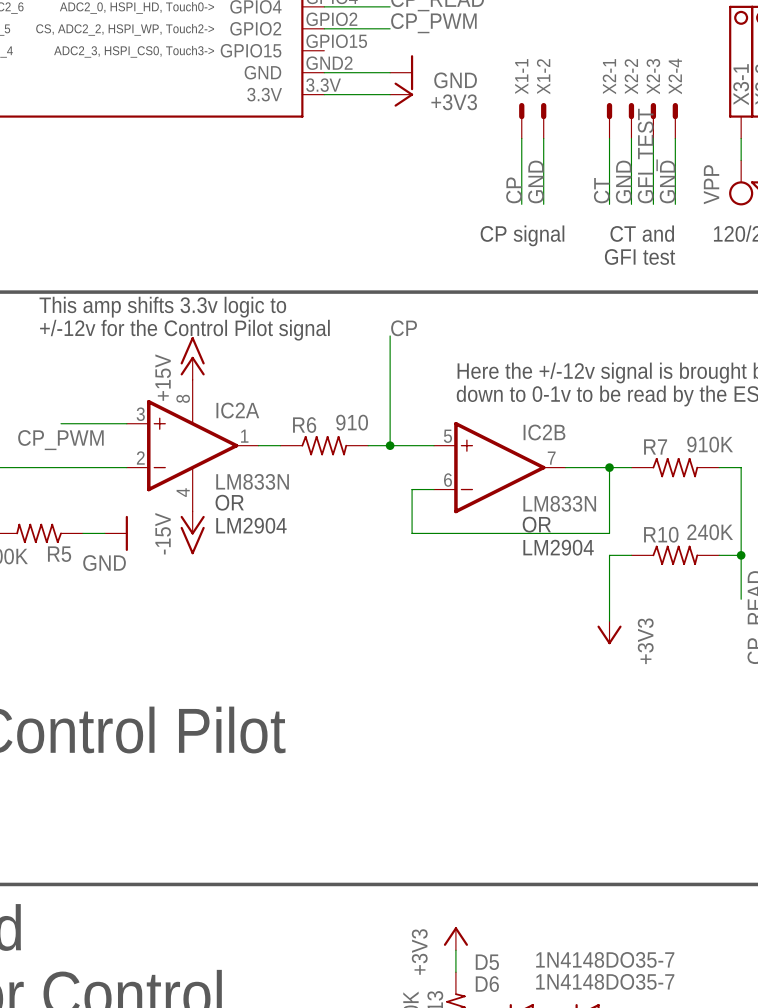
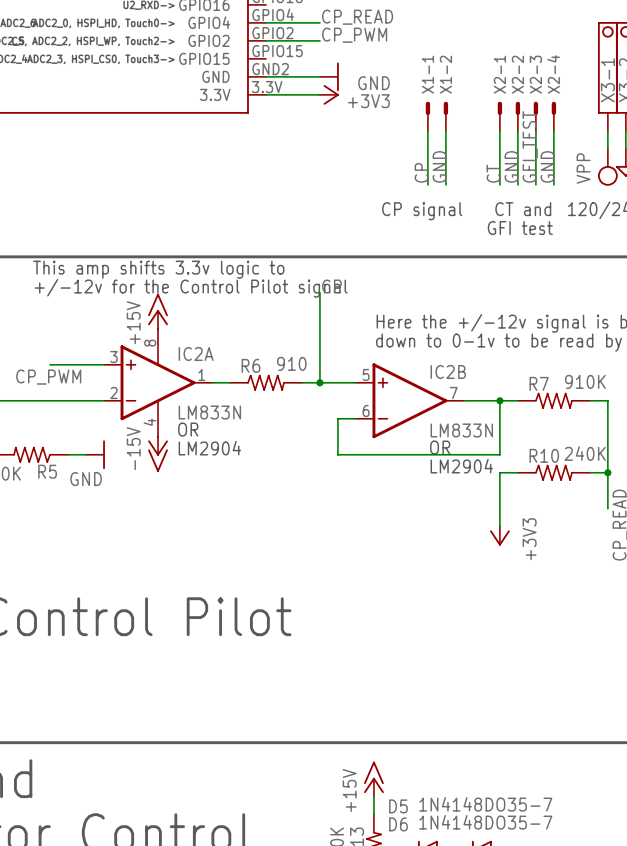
power symbol: none -> +15V (373, 779)
power symbol: +3V3 (455, 938) -> none

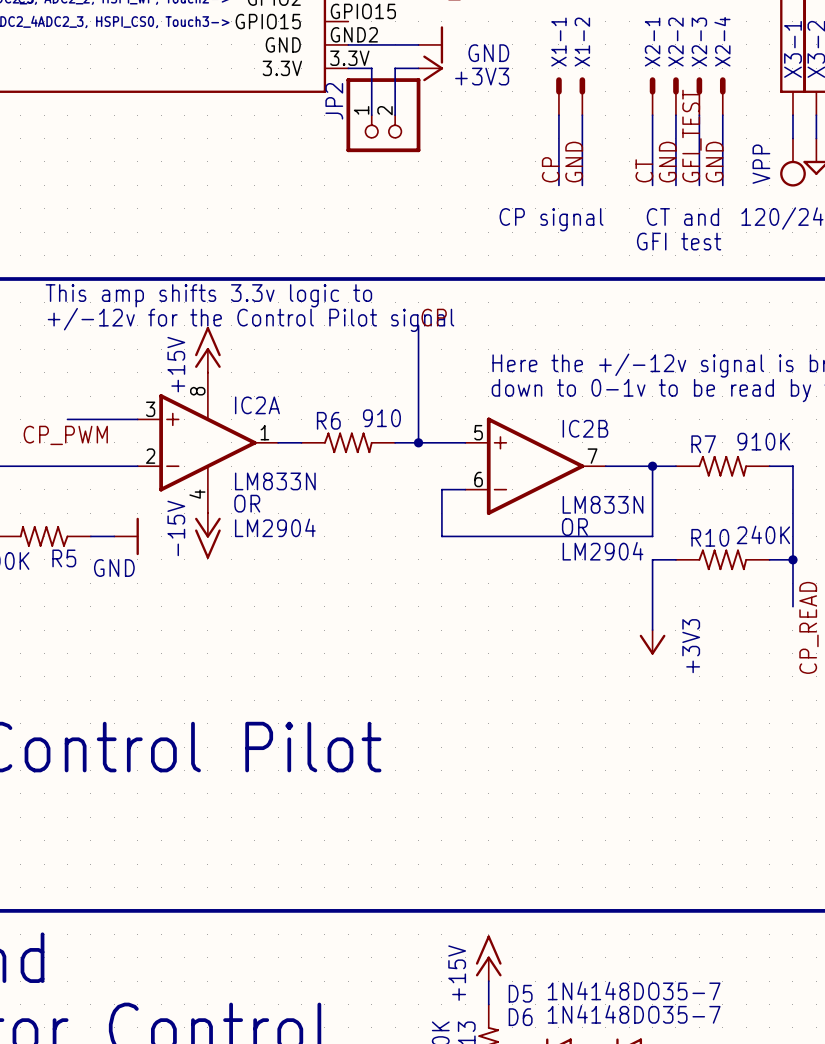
wire: (283, 94) (301, 94) -> (371, 68) (371, 115)
wire: none -> (395, 68) (395, 115)
JP2: none -> (383, 115)

